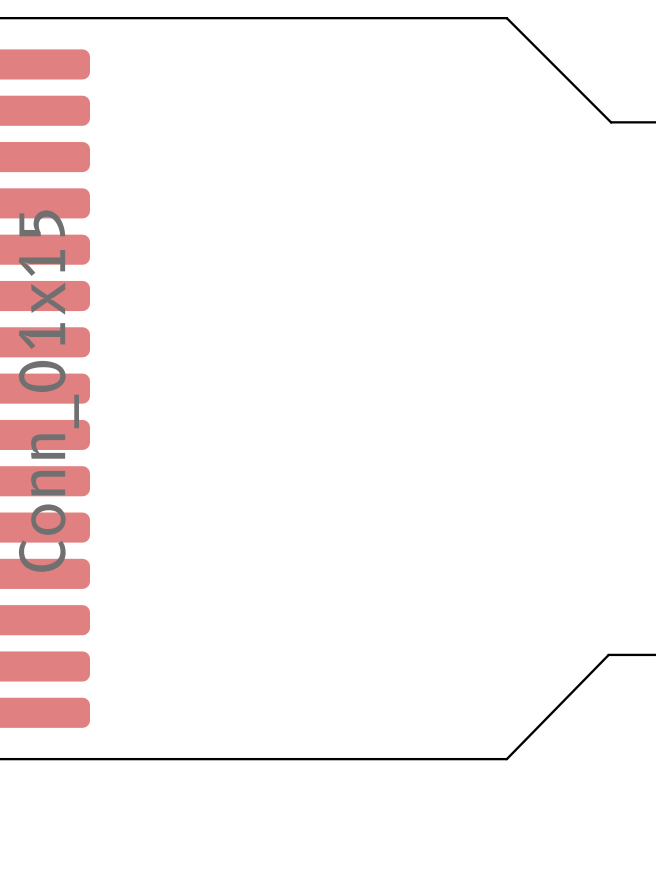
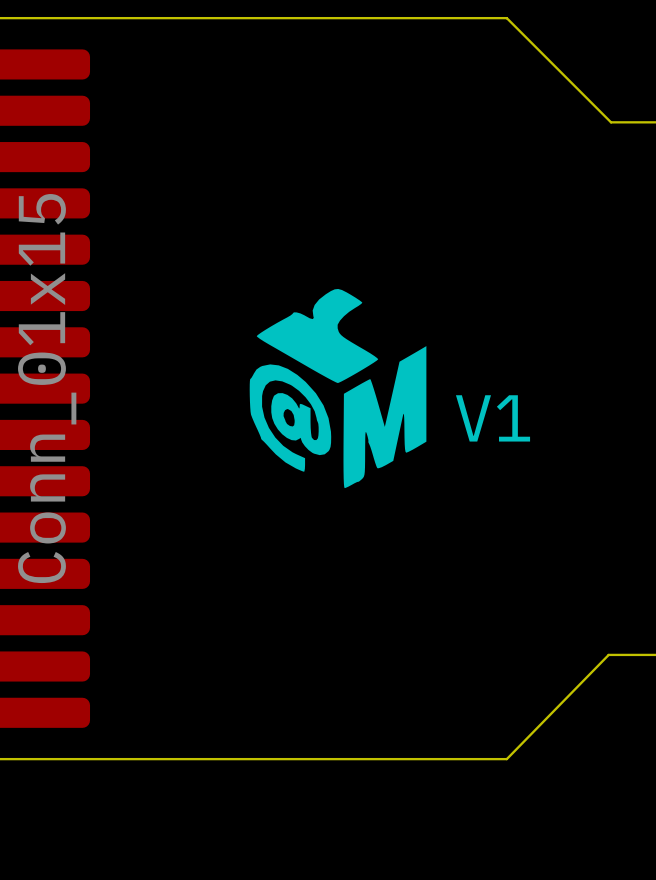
drawing: none -> [249, 288, 427, 489]
text: none -> V1 (493, 418)

